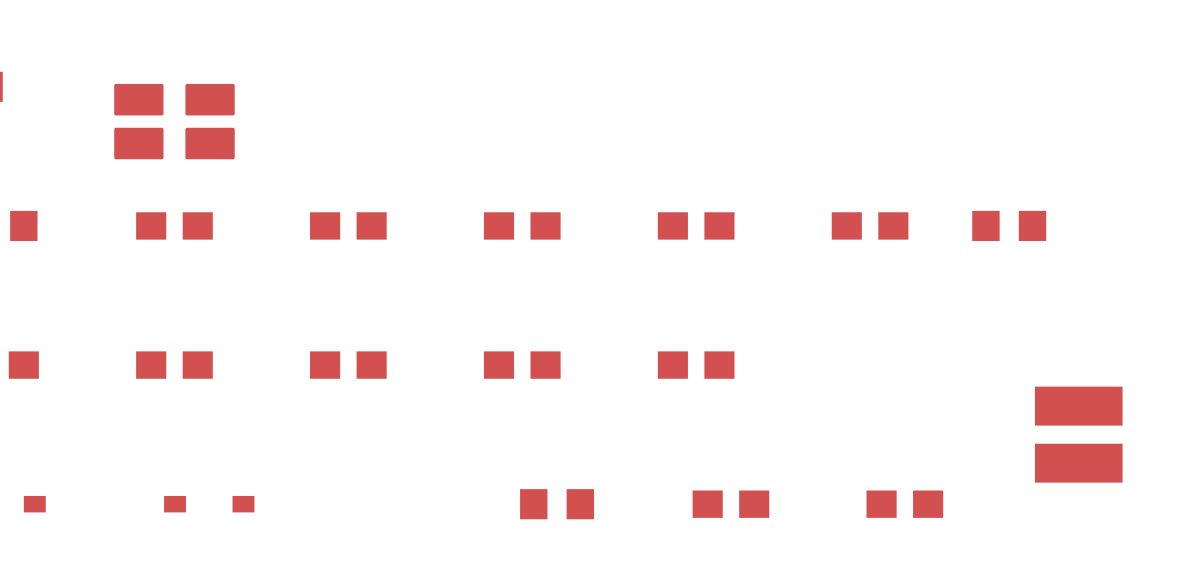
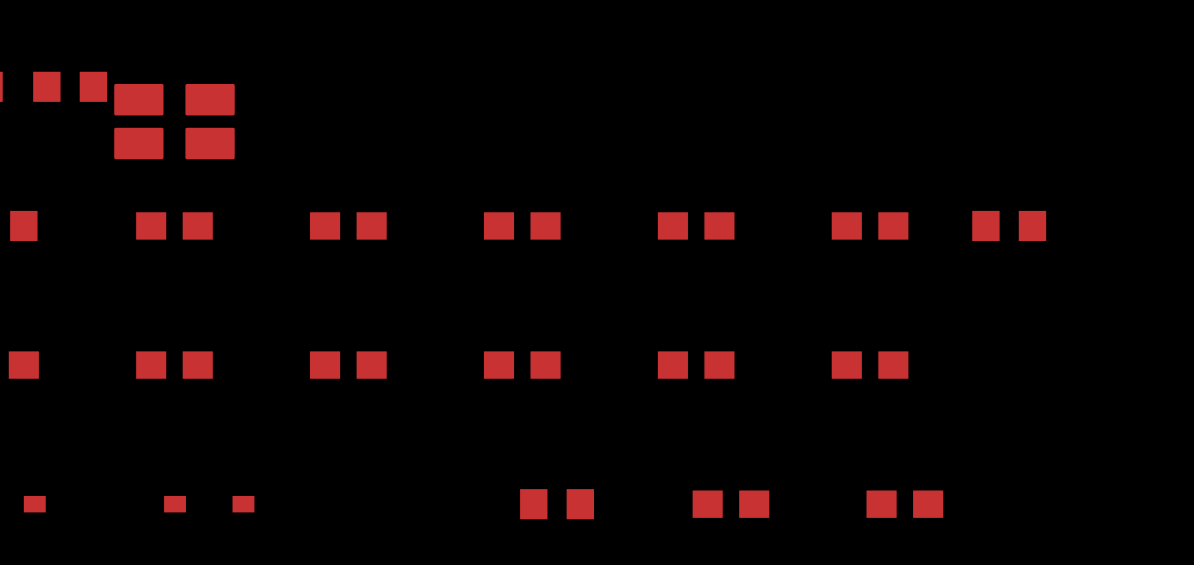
part: none -> (70, 86)
part: none -> (870, 365)
part: (1078, 434) -> none

